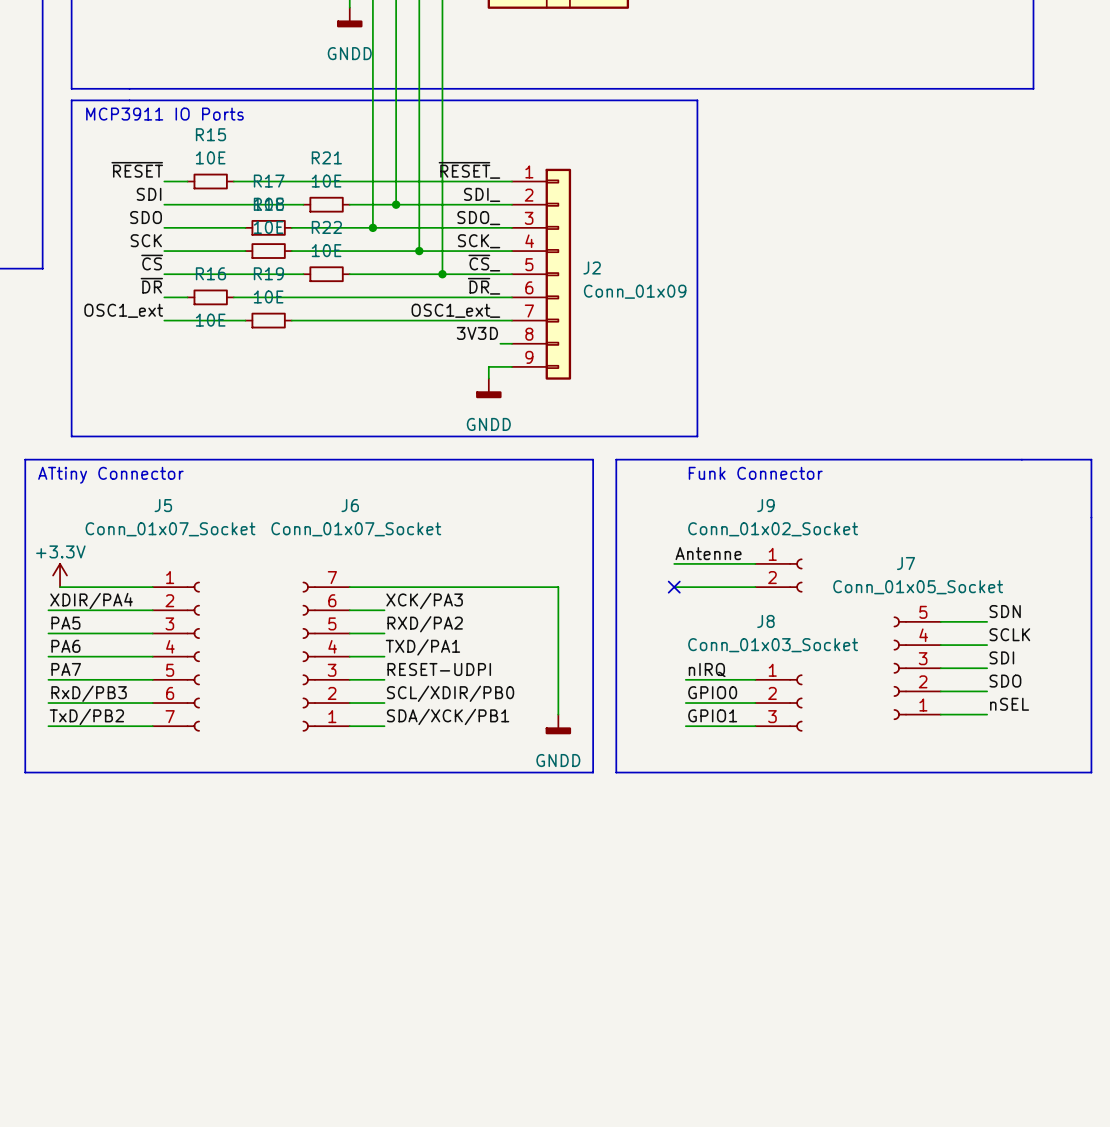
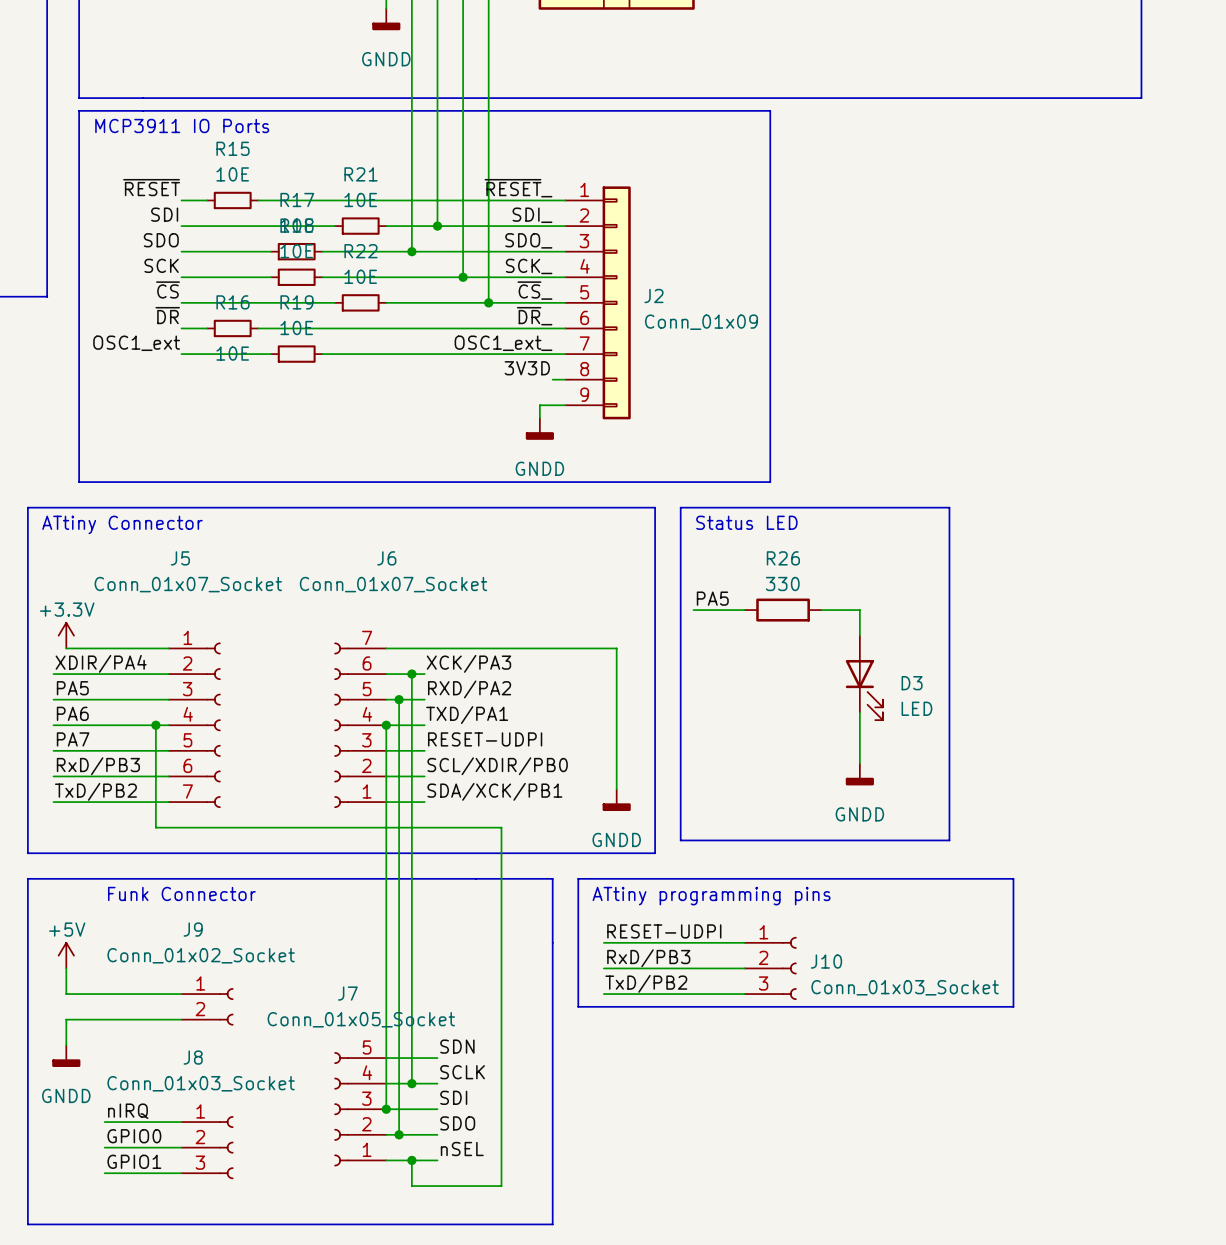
line: (859, 459) (1091, 459) (1091, 772) (616, 772) (616, 760) -> (949, 507) (949, 840) (680, 840)
text: none -> Status LED (746, 522)
text: Funk Connector (755, 473) -> none
label: none -> PA5 (712, 598)
wire: none -> (693, 610) (744, 610)
R26: none -> 330 (783, 610)
wire: none -> (821, 610) (859, 610) (859, 635)
label: Antenne (708, 553) -> none
wire: (674, 563) (755, 563) -> none
J9 position: (778, 575) -> (207, 1006)
wire: (674, 587) (755, 587) -> none
no-connect mark: (674, 587) -> none
wire: none -> (411, 674) (411, 1083)
junction: none -> (411, 674)
label: SDN (1005, 611) -> none
D3: none -> LED (864, 677)
wire: (940, 621) (987, 621) -> none
wire: none -> (399, 699) (399, 1134)
junction: none -> (399, 699)
label: SCLK (1009, 634) -> none
wire: none -> (859, 712) (859, 763)
wire: (940, 645) (987, 645) -> none
wire: none -> (155, 725) (155, 827) (501, 827) (501, 1186) (411, 1186) (411, 1160)
junction: none -> (155, 725)
wire: none -> (386, 725) (386, 1109) (437, 1109)
junction: none -> (386, 725)
label: SDI (1001, 657) -> none
J7 position: (917, 668) -> (360, 1109)
wire: (940, 668) (987, 668) -> none
label: nIRQ (707, 670) -> none
wire: (685, 679) (755, 679) -> none
label: SDO (1005, 681) -> none
wire: (940, 691) (987, 691) -> none
label: GPIO0 (712, 692) -> none
power symbol: none -> GNDD (859, 774)
wire: (685, 703) (755, 703) -> none
J8 position: (778, 703) -> (207, 1147)
label: nSEL (1009, 704) -> none
wire: (940, 714) (987, 714) -> none
label: GPIO1 (712, 715) -> none
wire: (685, 726) (755, 726) -> none
line: none -> (27, 878) (552, 878) (552, 1224) (27, 1224) (27, 878)
line: none -> (578, 878) (1013, 878) (1013, 1006) (578, 1006) (578, 878)
text: none -> Funk Connector (181, 893)
text: none -> ATtiny programming pins (711, 896)
label: none -> RESET-UDPI (664, 931)
wire: none -> (603, 942) (744, 942)
power symbol: none -> +5V (66, 955)
label: none -> RxD/PB3 (648, 958)
wire: none -> (66, 968) (66, 994) (181, 994)
wire: none -> (603, 968) (744, 968)
J10: none -> Conn_01x03_Socket (770, 968)
label: none -> TxD/PB2 (646, 983)
wire: none -> (603, 994) (744, 994)
wire: none -> (181, 1019) (66, 1019) (66, 1045)
label: none -> SDN (457, 1046)
power symbol: none -> GNDD (66, 1056)
wire: none -> (386, 1058) (437, 1058)
label: none -> SCLK (462, 1072)
wire: none -> (386, 1083) (437, 1083)
junction: none -> (411, 1083)
label: none -> SDI (453, 1097)
junction: none -> (386, 1109)
label: none -> nIRQ (128, 1111)
wire: none -> (104, 1122) (181, 1122)
label: none -> SDO (457, 1123)
wire: none -> (386, 1134) (437, 1134)
junction: none -> (399, 1134)
label: none -> GPIO0 (134, 1136)
wire: none -> (104, 1147) (181, 1147)
label: none -> nSEL (462, 1149)
wire: none -> (386, 1160) (437, 1160)
junction: none -> (411, 1160)
label: none -> GPIO1 (134, 1161)
wire: none -> (104, 1173) (181, 1173)

